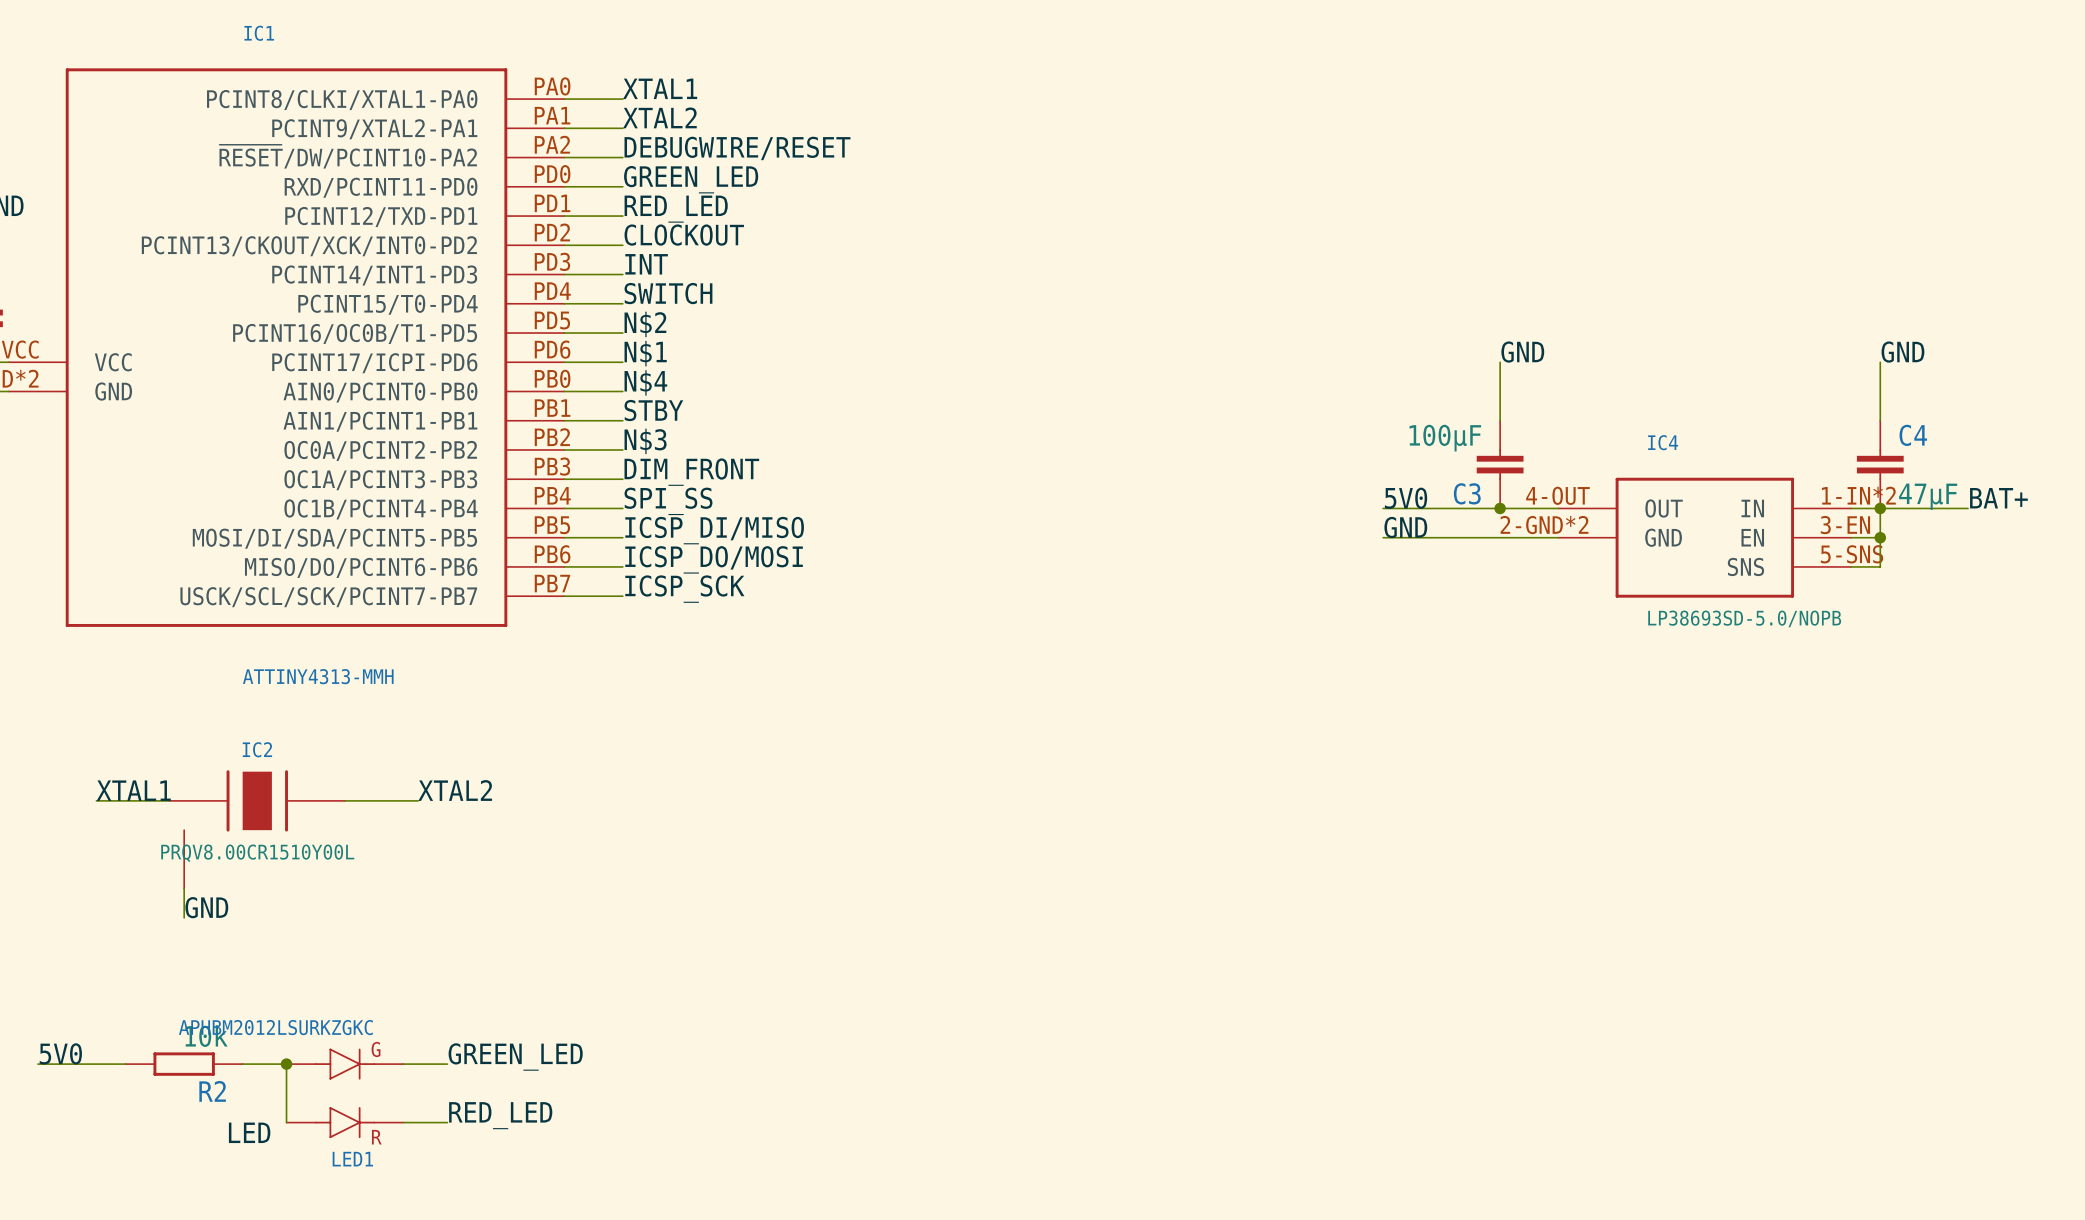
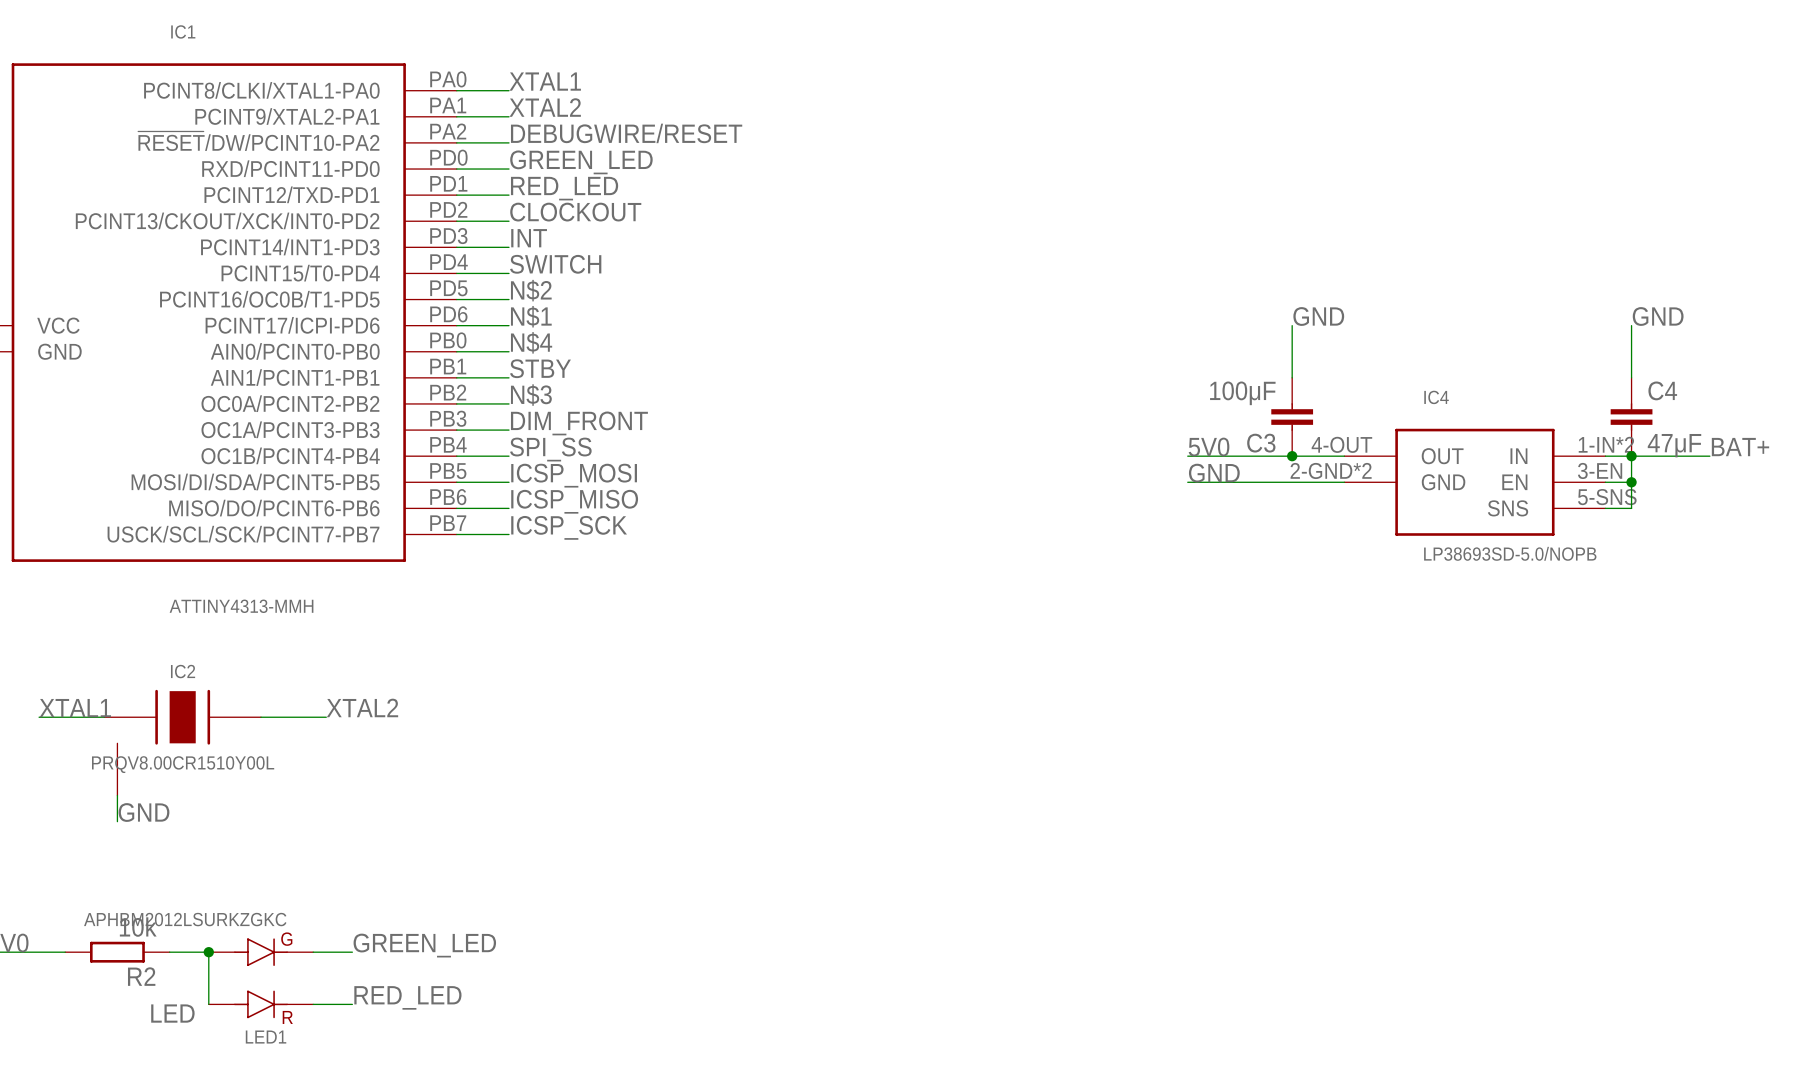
label: ICSP_DI/MISO (714, 530) -> ICSP_MOSI (574, 475)
label: ICSP_DO/MOSI (714, 559) -> ICSP_MISO (574, 501)

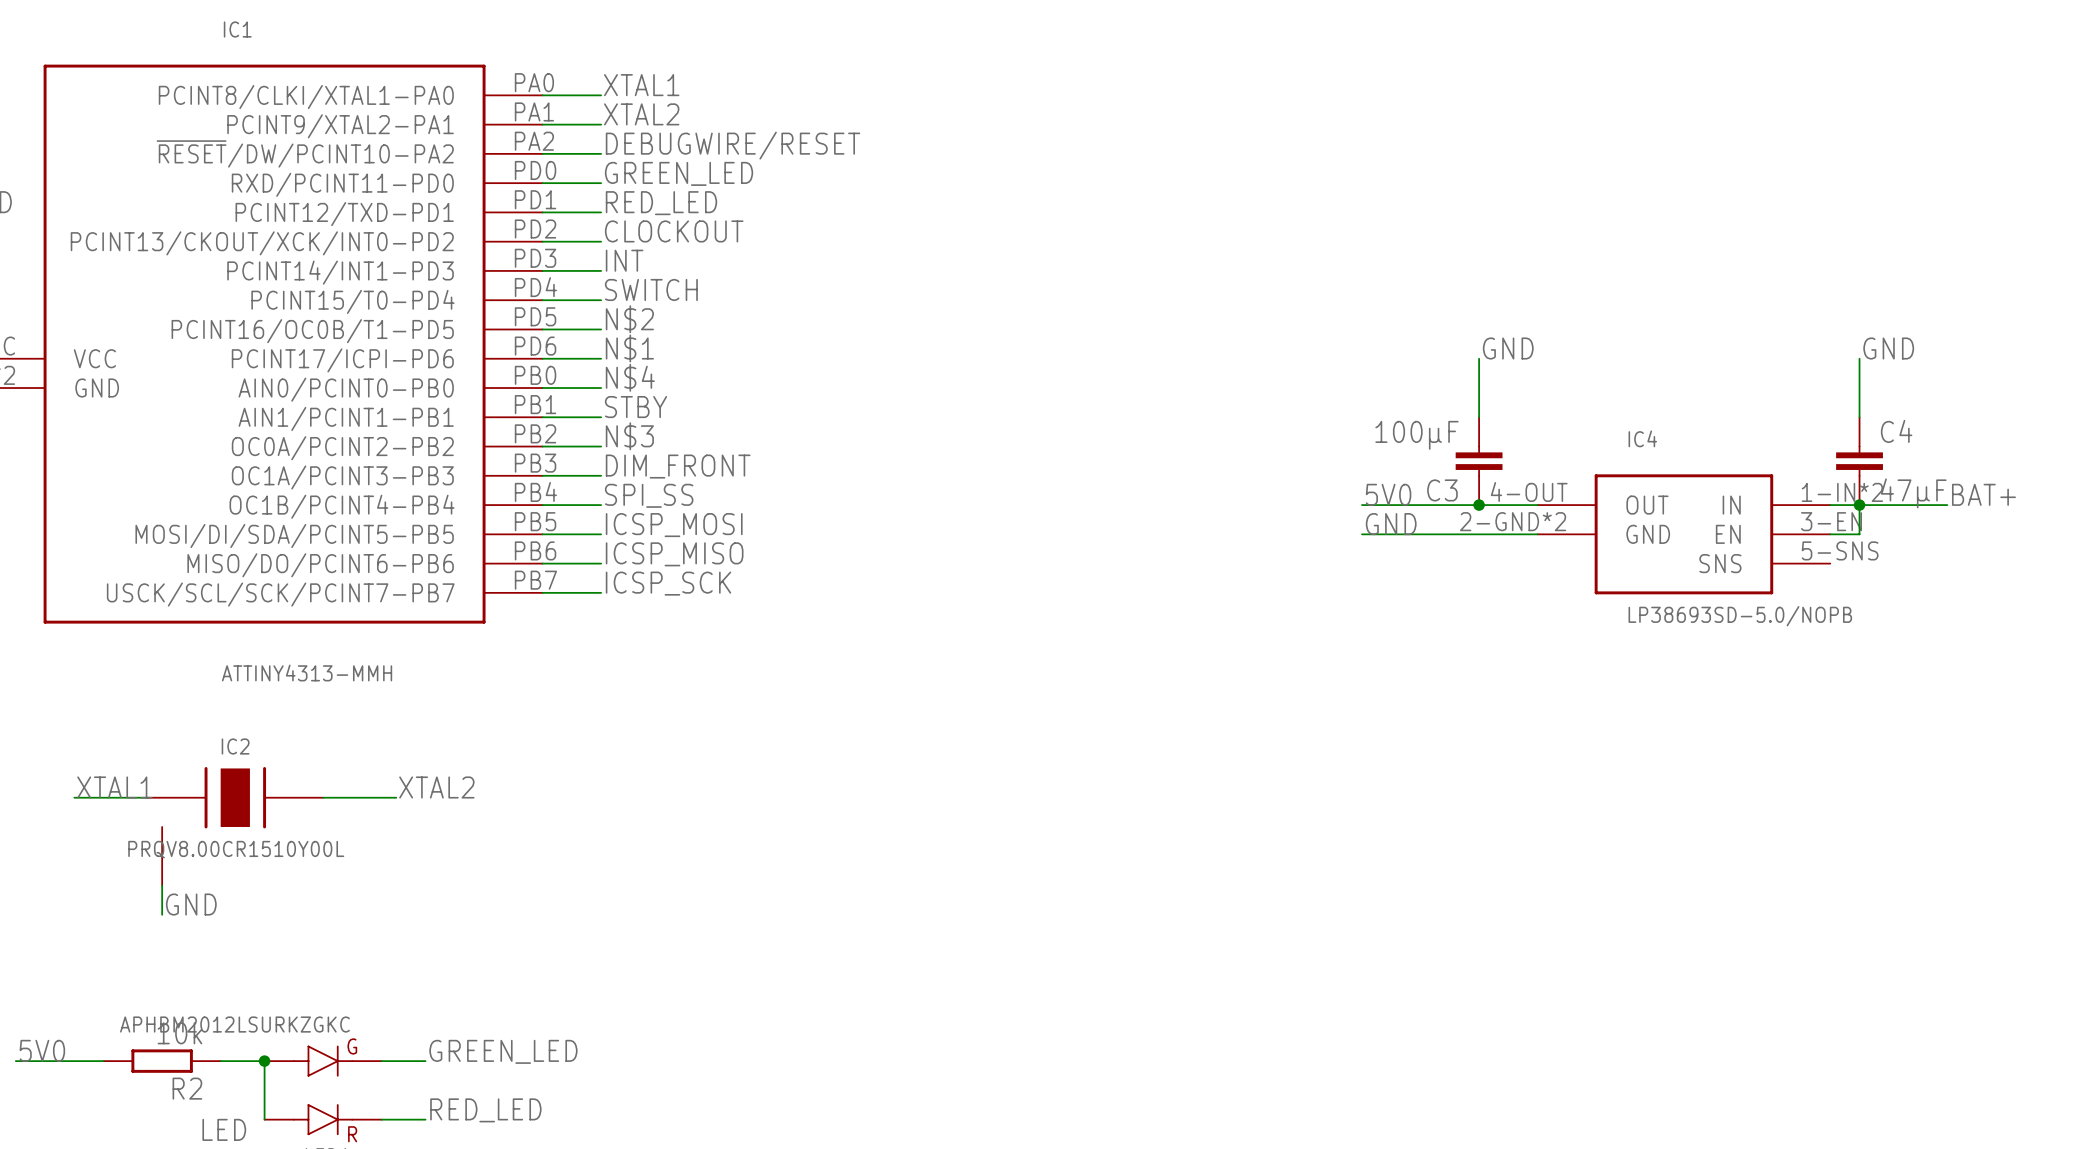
wire: (1631, 482) (1631, 508) (1605, 508) -> none
junction: (1631, 482) -> none

